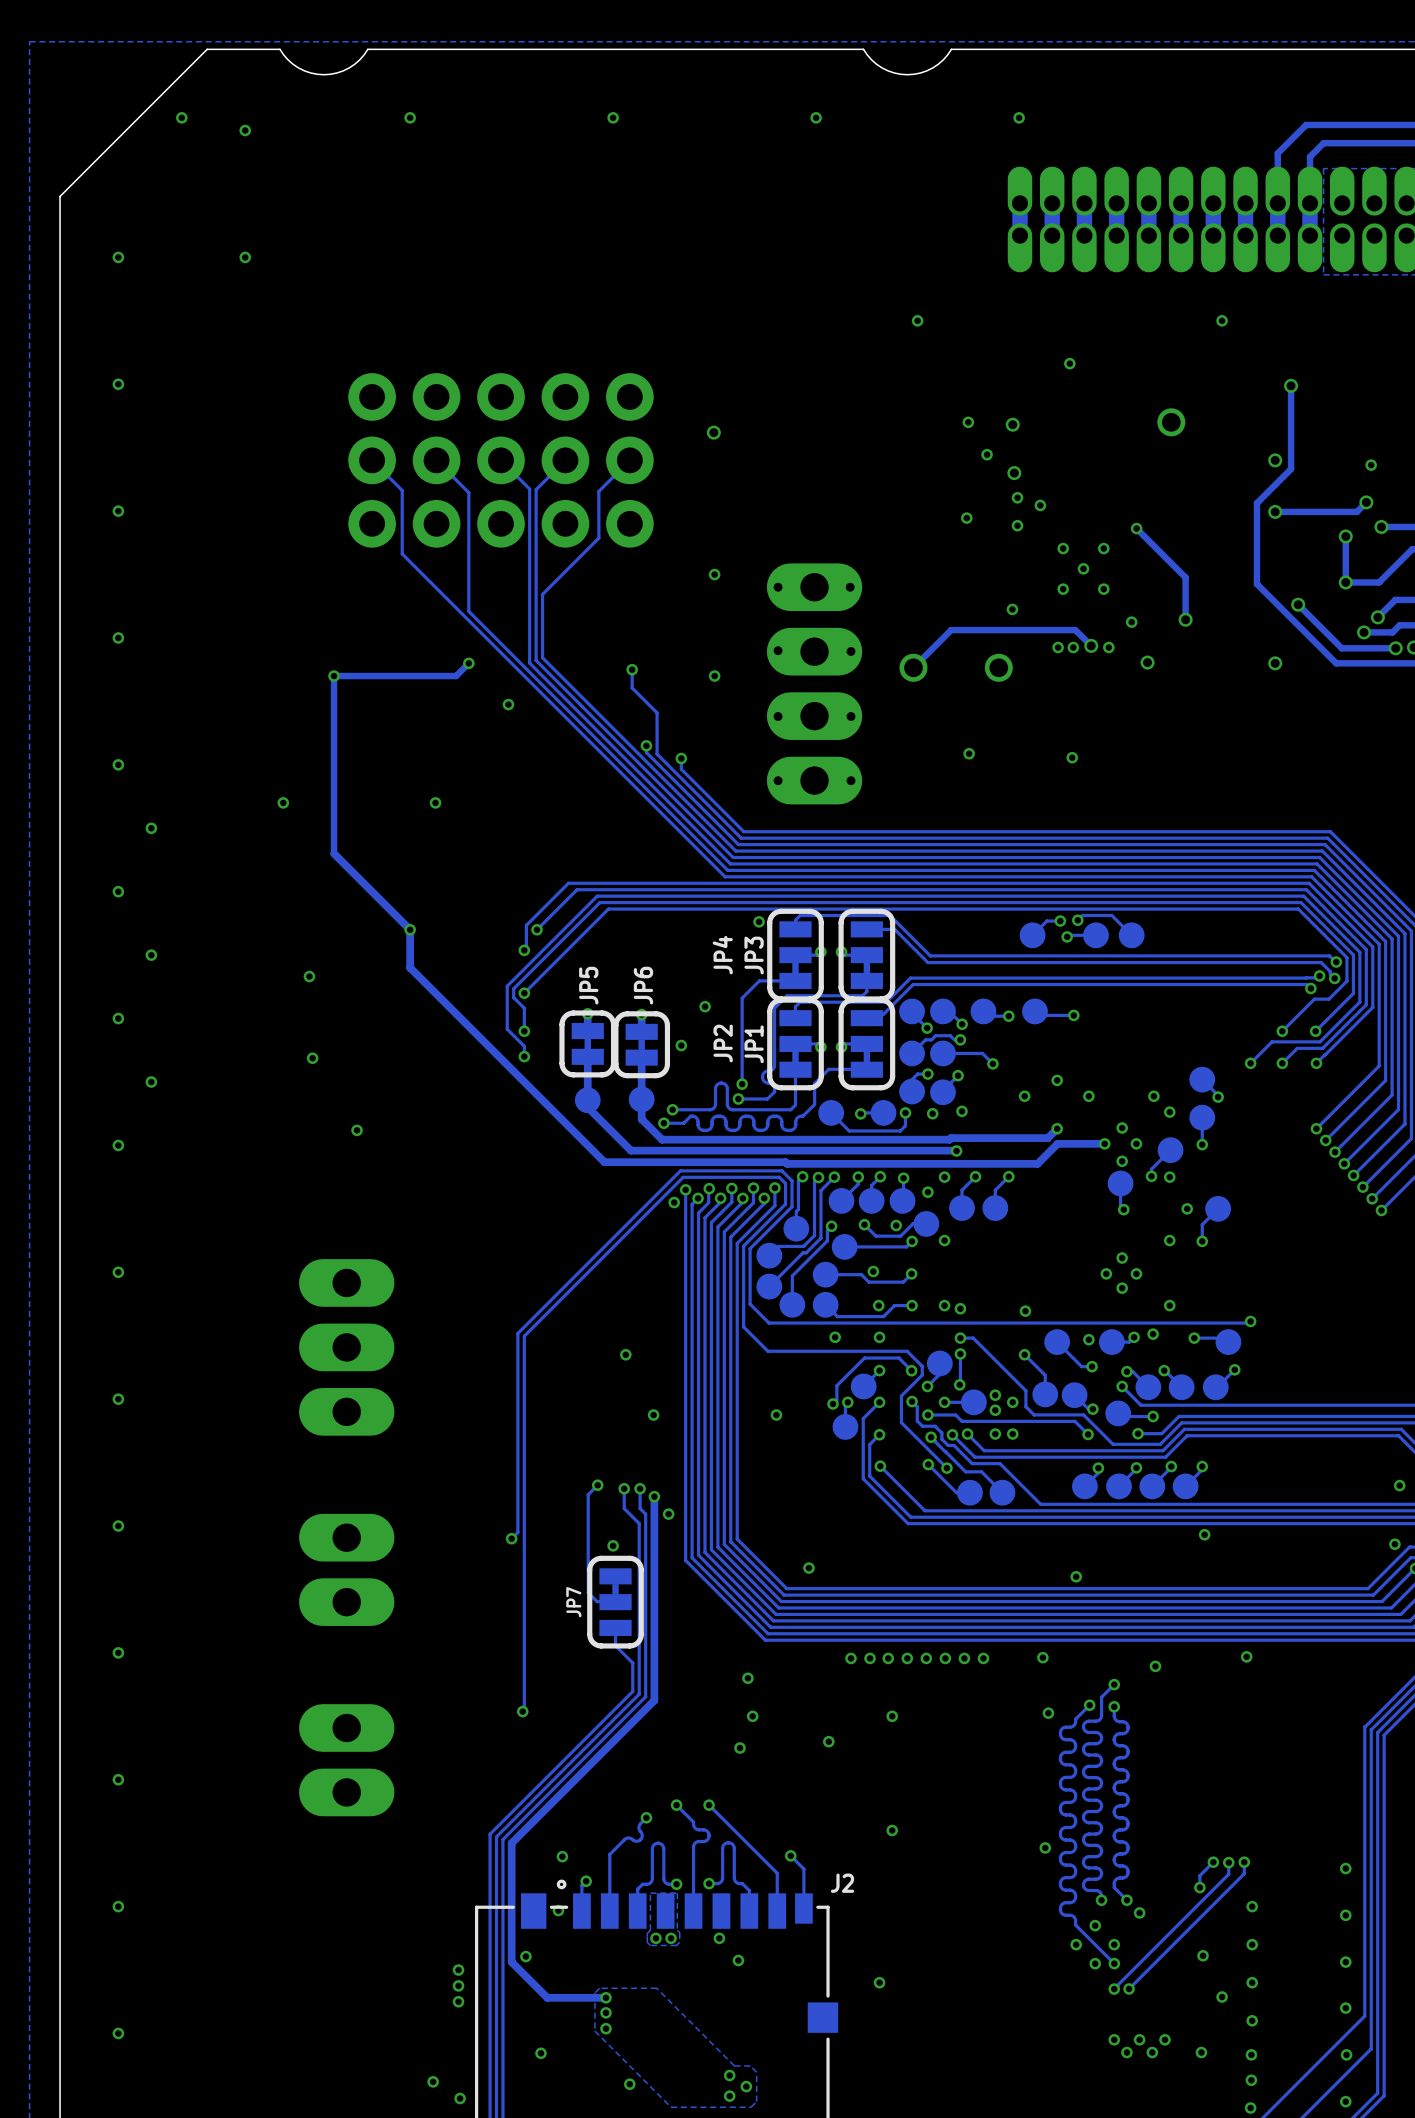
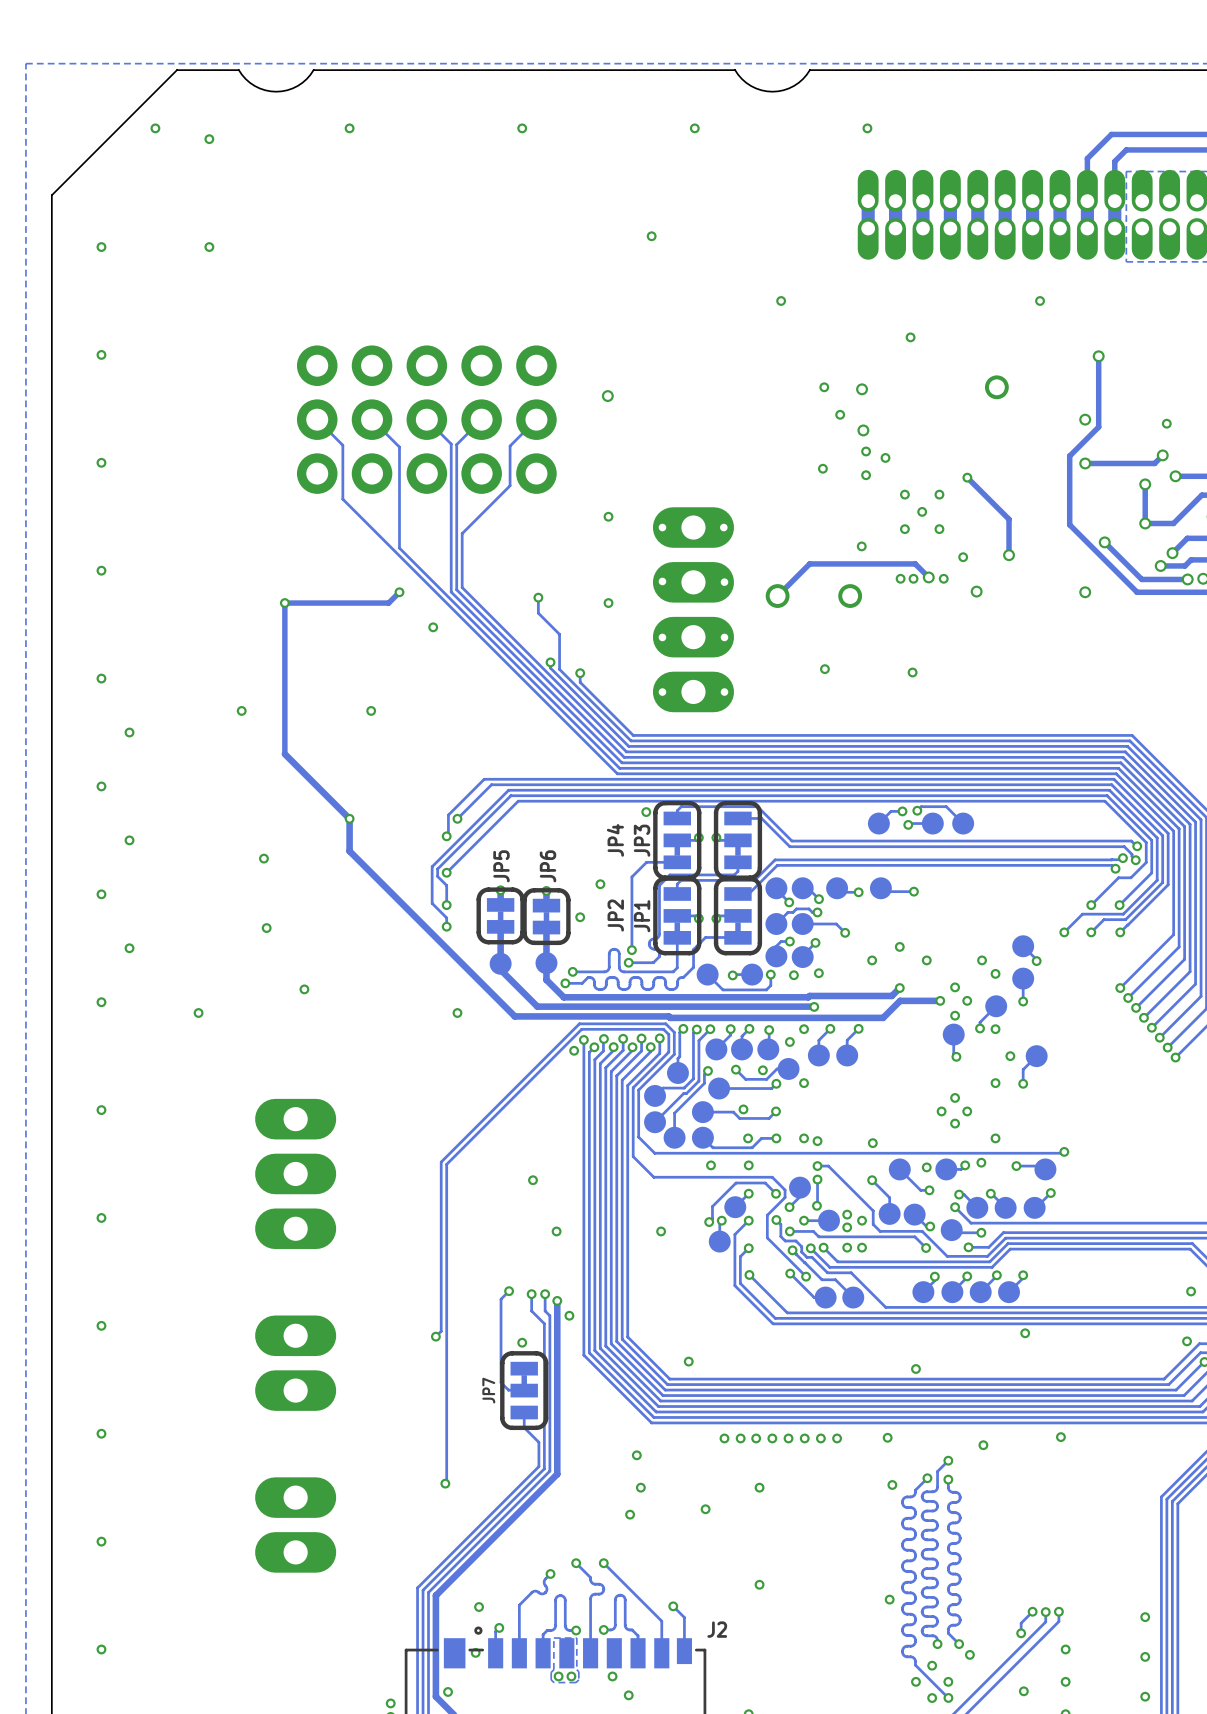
via: none -> (651, 236)
via: none -> (198, 1013)
via: none -> (457, 1013)

